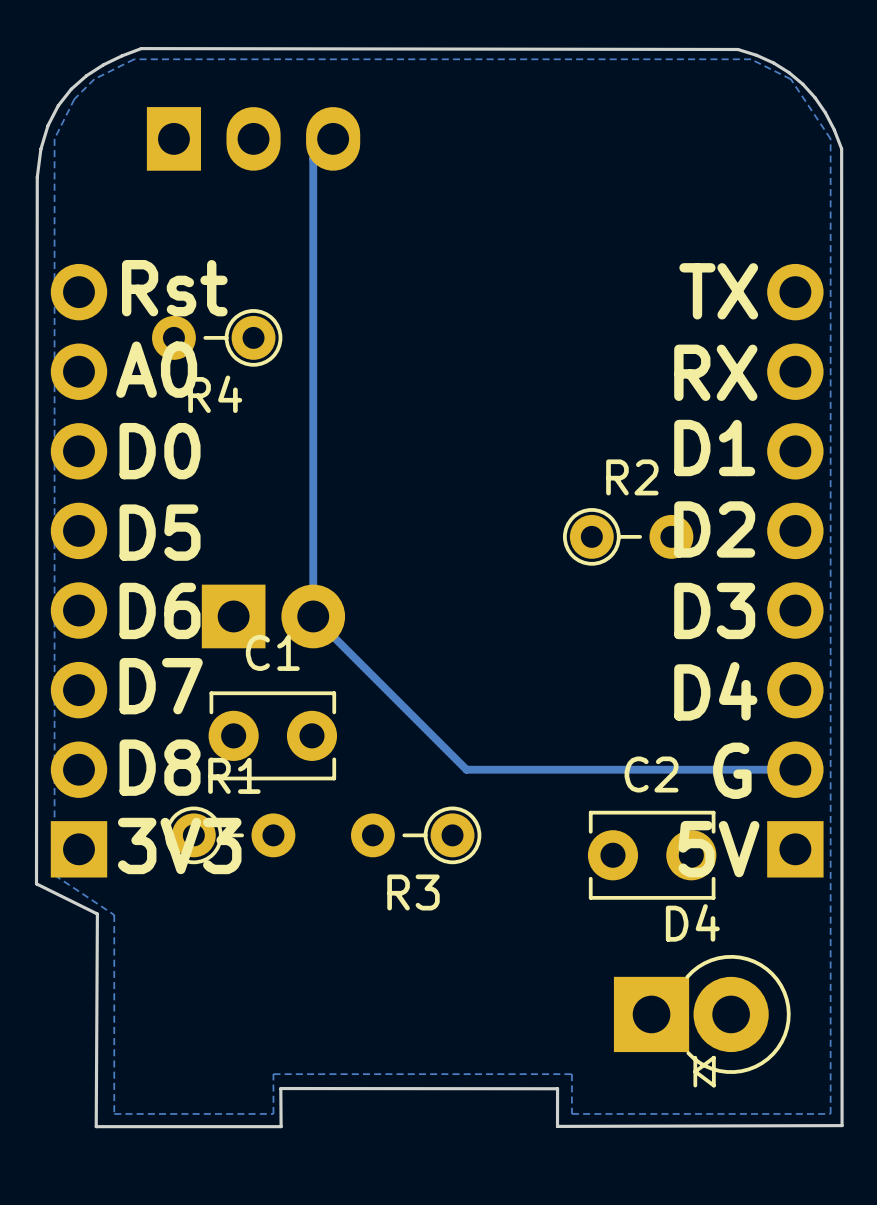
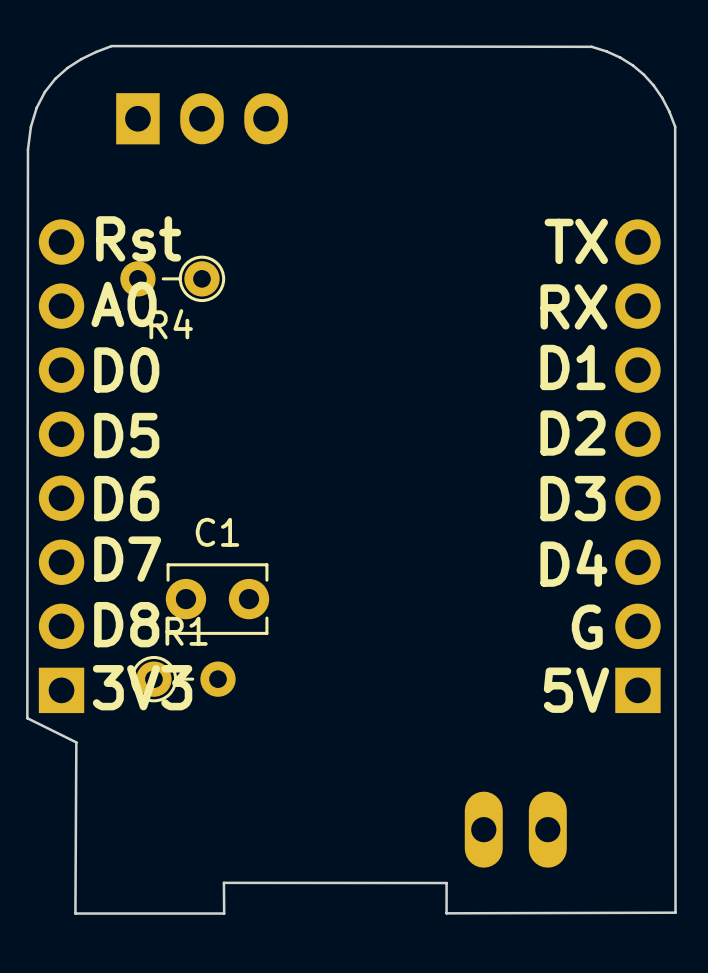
zone outline: (751, 59) (790, 79) (830, 138) (830, 1113) (571, 1113) (571, 1074) (273, 1074) (273, 1113) (114, 1113) (114, 914) (54, 875) (54, 138) (74, 99) (94, 79) (134, 59) (751, 59) -> none
track: (333, 138) (313, 158) (313, 616) (466, 769) (795, 769) -> none
R2: (628, 536) -> none
part: (273, 616) -> none
R3: (416, 835) -> none
C2: (652, 855) -> none
D4: (702, 1021) -> none
part: none -> (515, 829)

